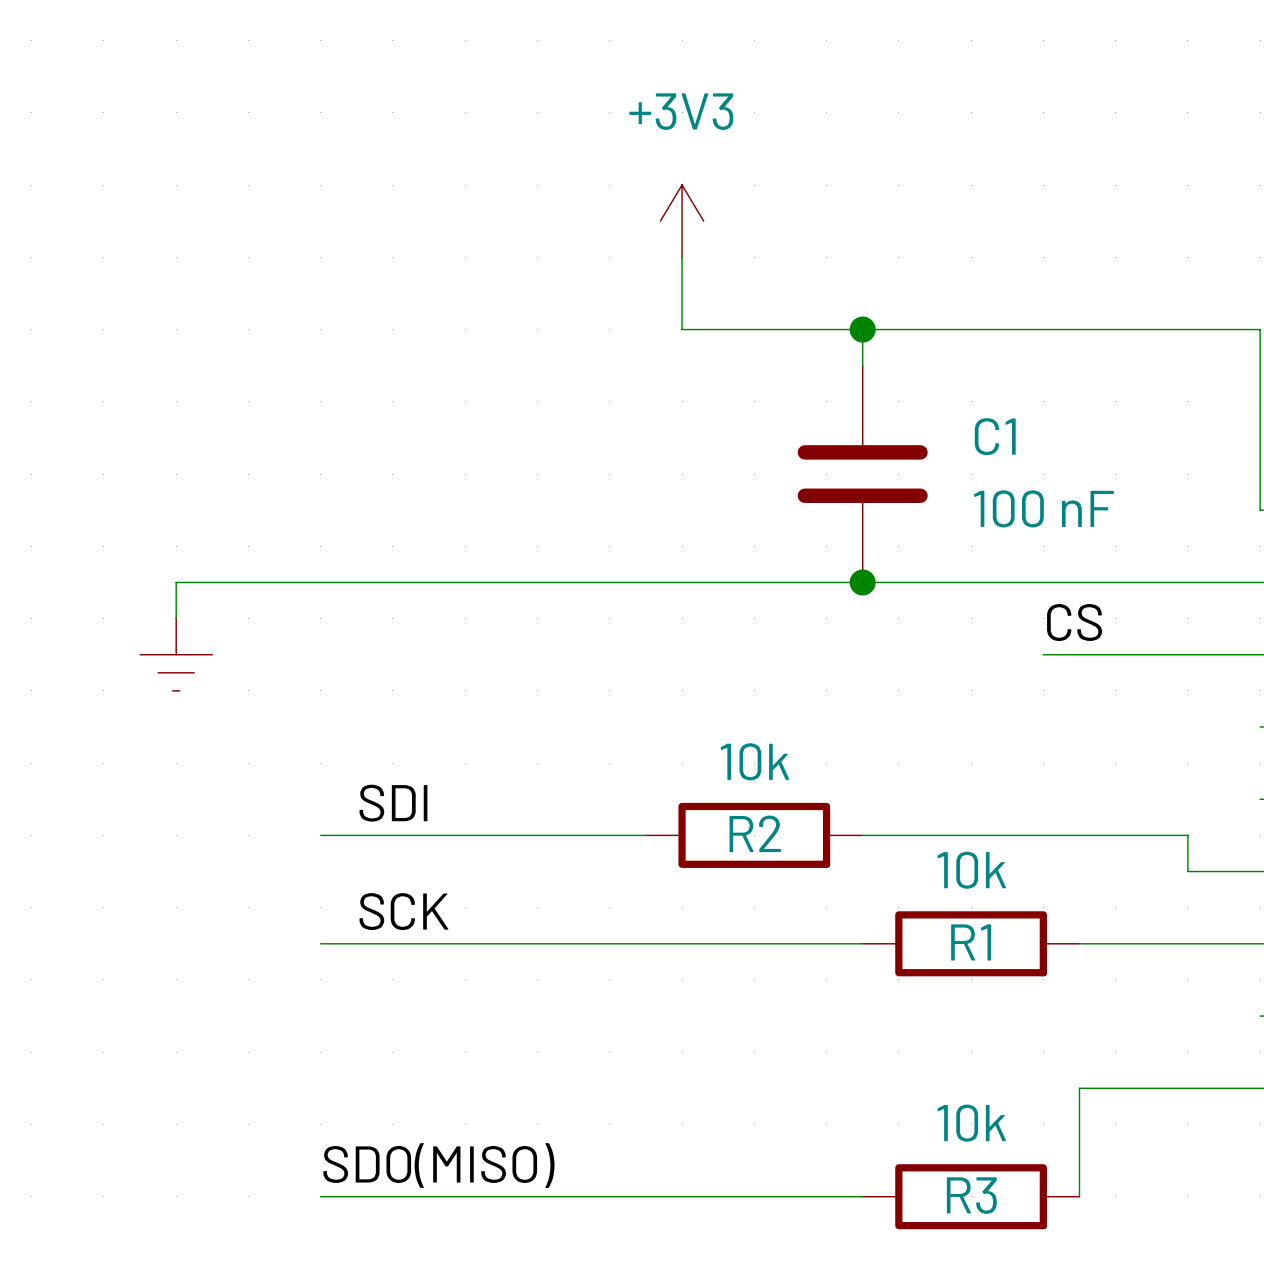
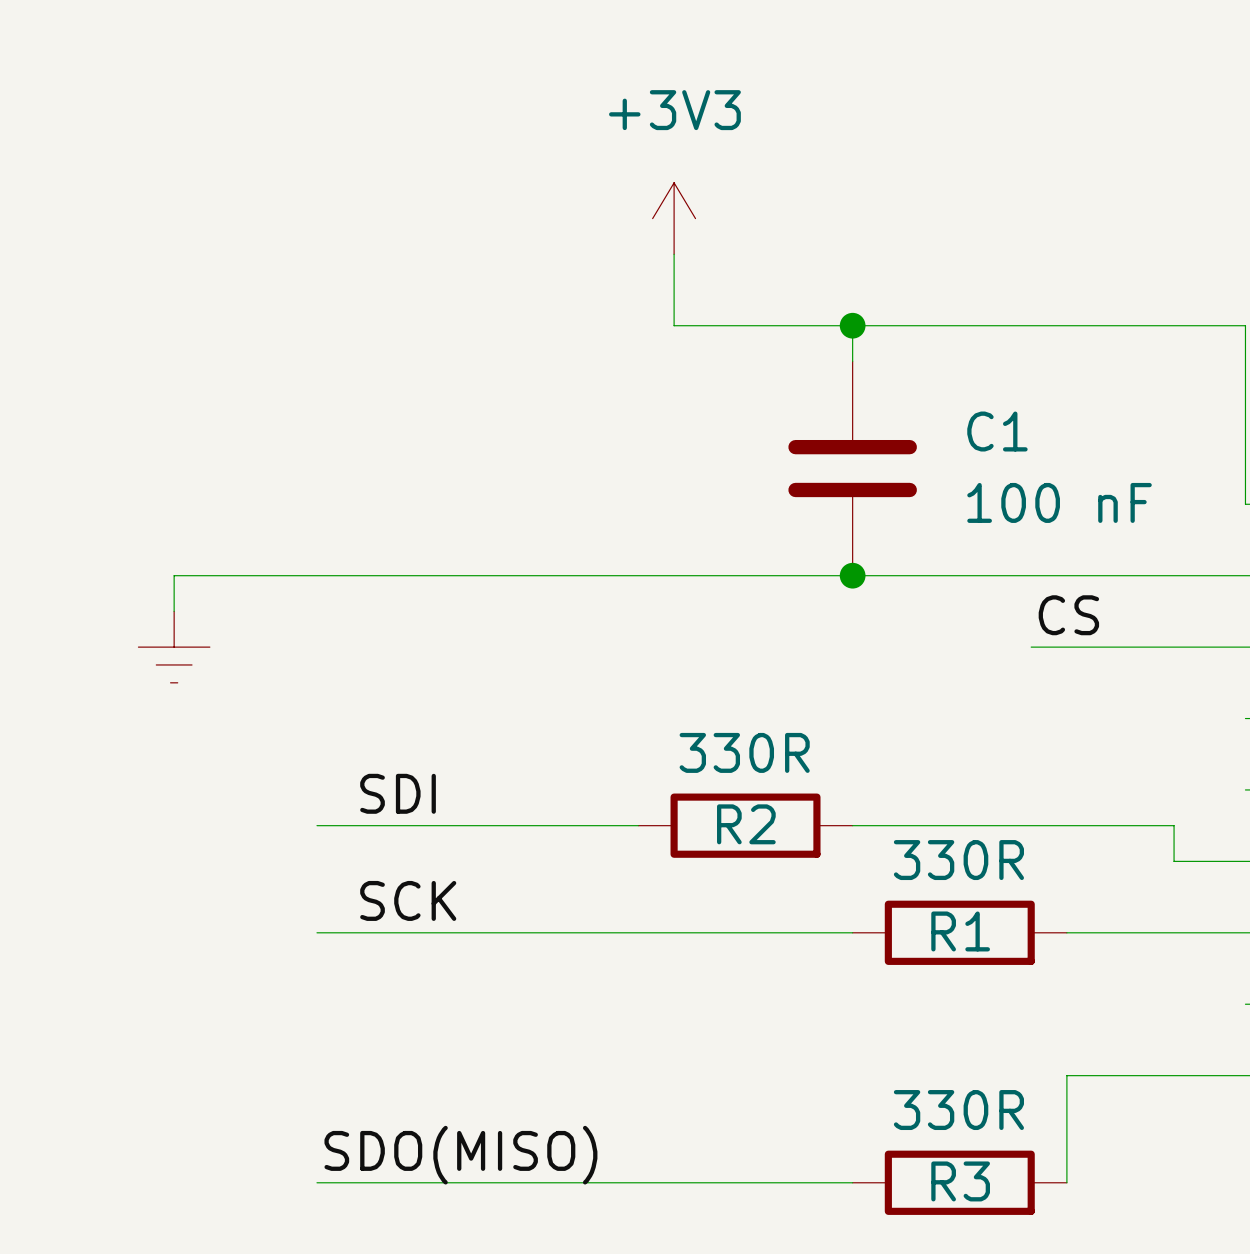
R2 value: 10k (755, 761) -> 330R (744, 752)
R1 value: 10k (971, 870) -> 330R (958, 860)
R3 value: 10k (971, 1123) -> 330R (958, 1110)

